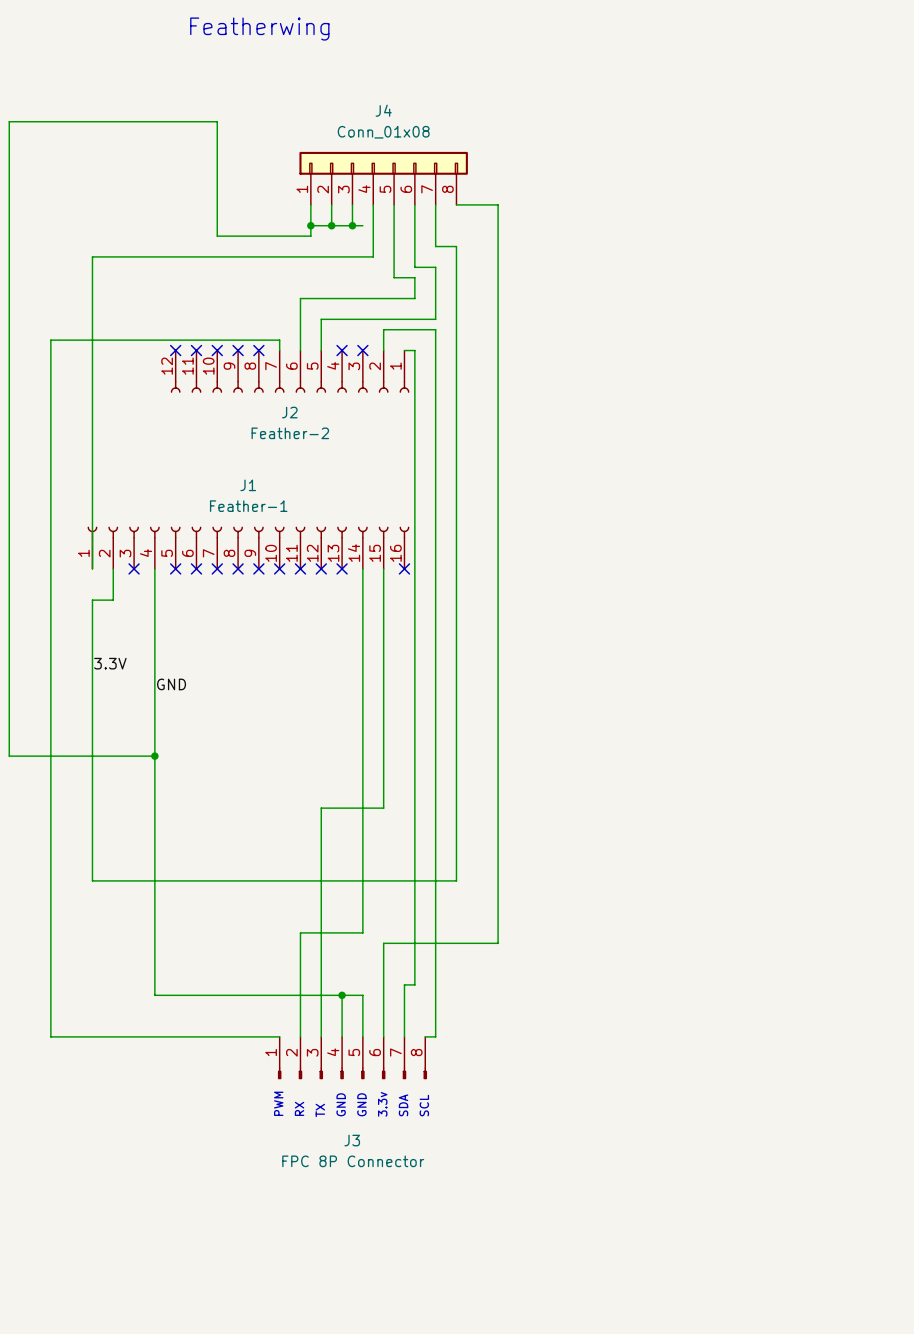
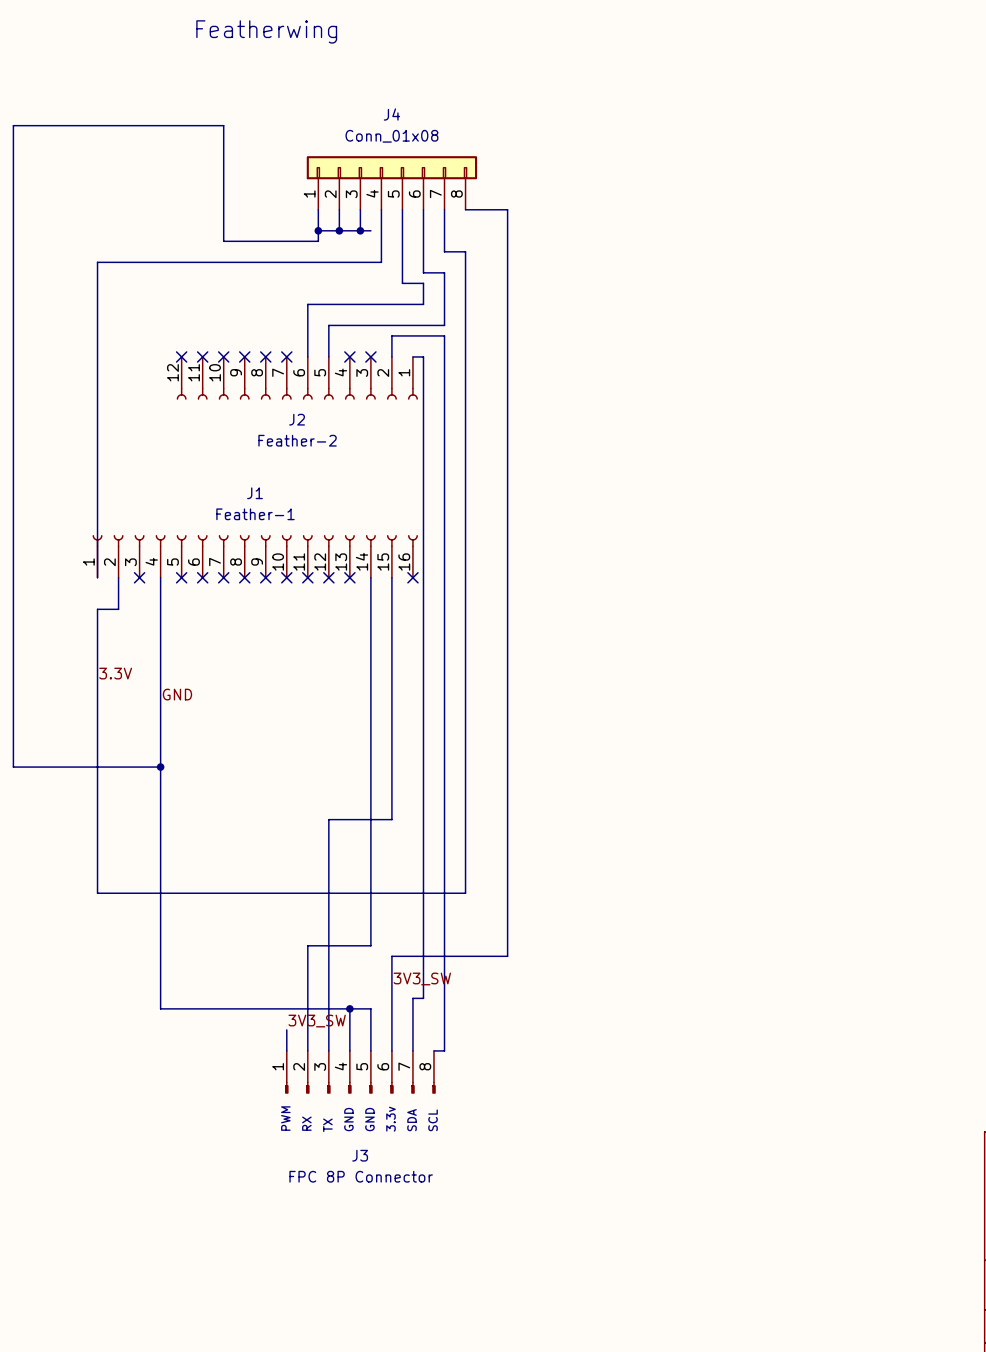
wire: (279, 350) (279, 340) (50, 340) (50, 1036) (279, 1036) -> (286, 1029) (286, 1050)
no-connect mark: none -> (286, 356)
label: none -> 3V3_SW (422, 978)
label: none -> 3V3_SW (317, 1021)

